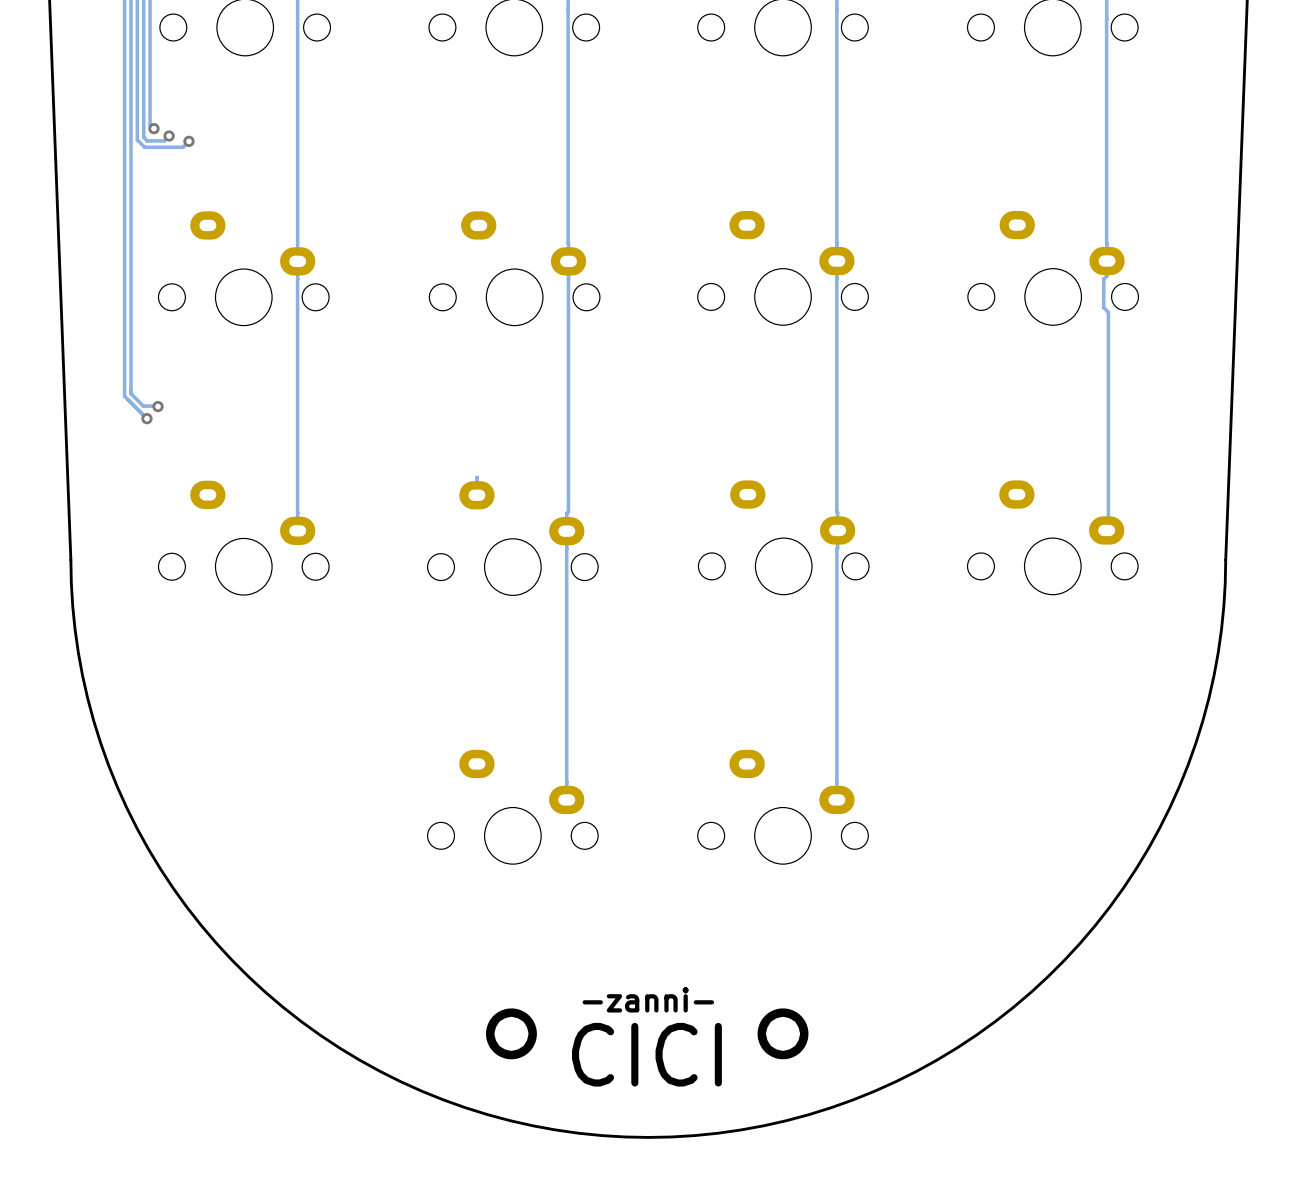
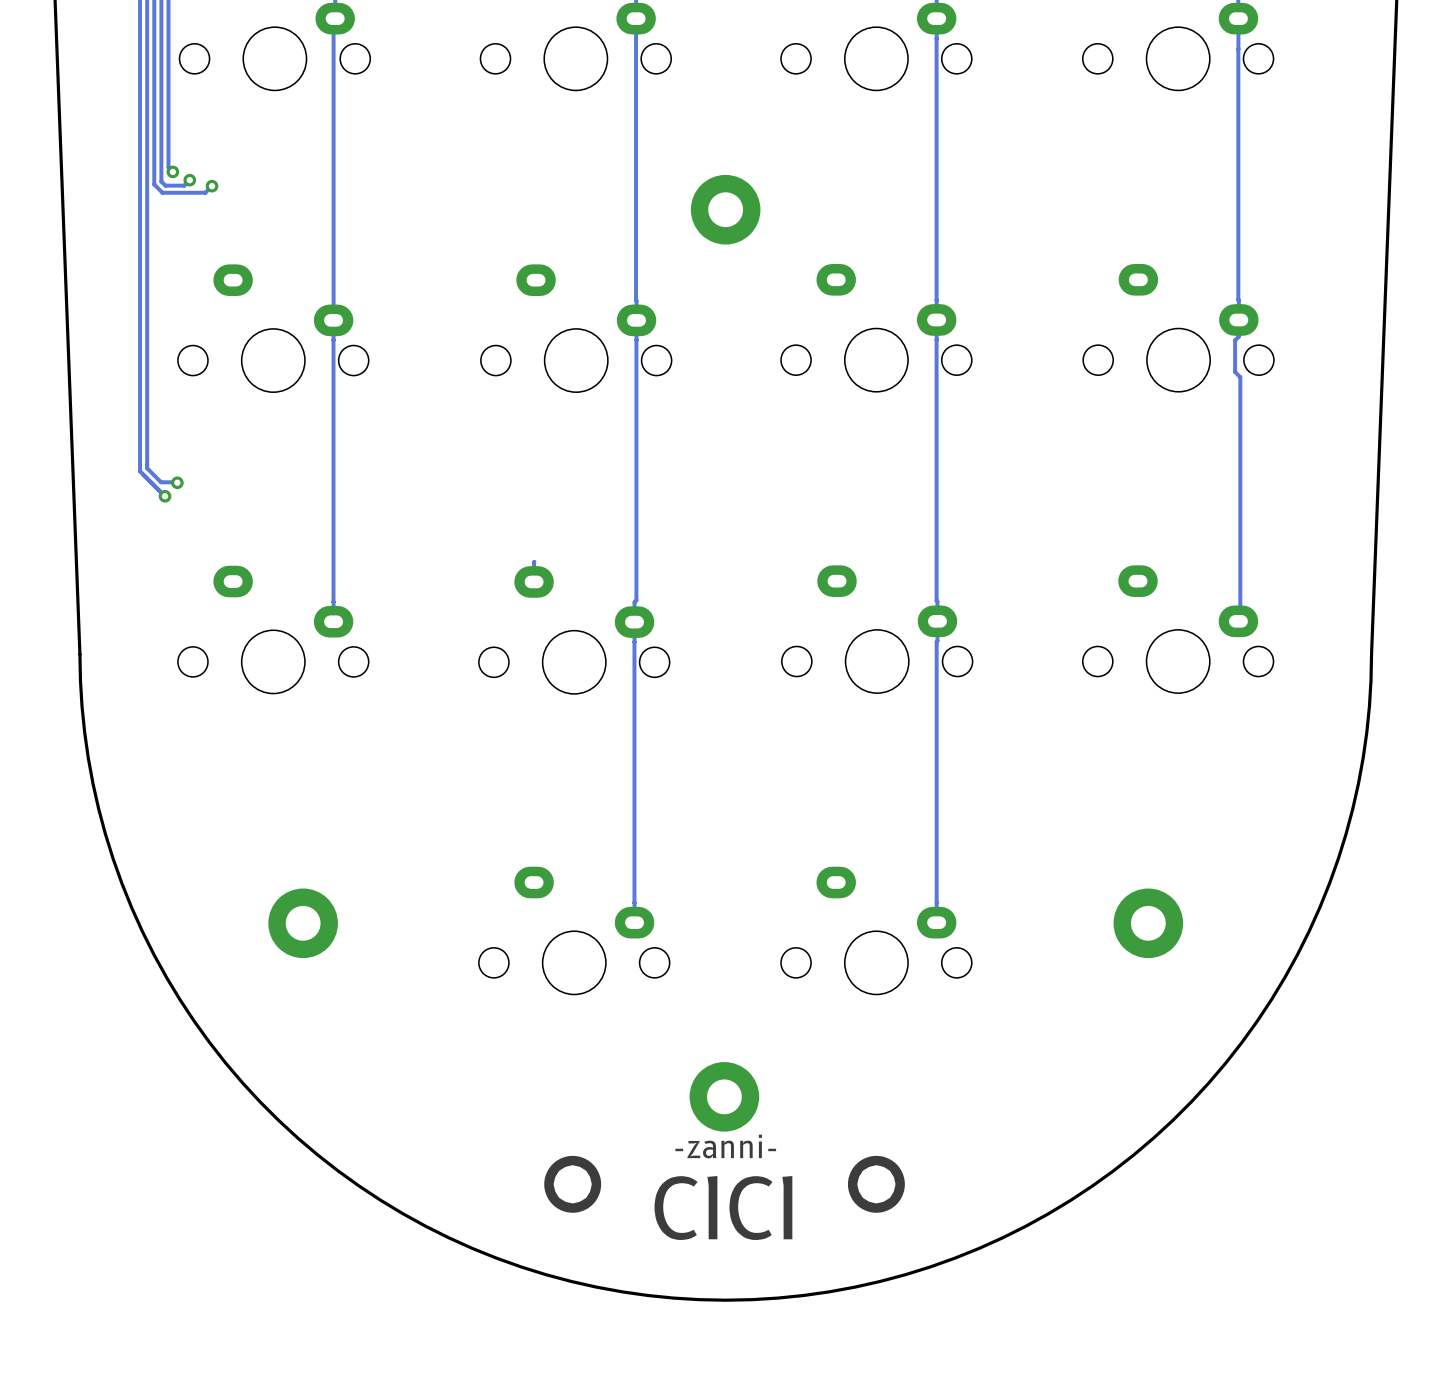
part: none -> (725, 209)
part: none -> (303, 923)
part: none -> (1148, 923)
part: none -> (724, 1096)

